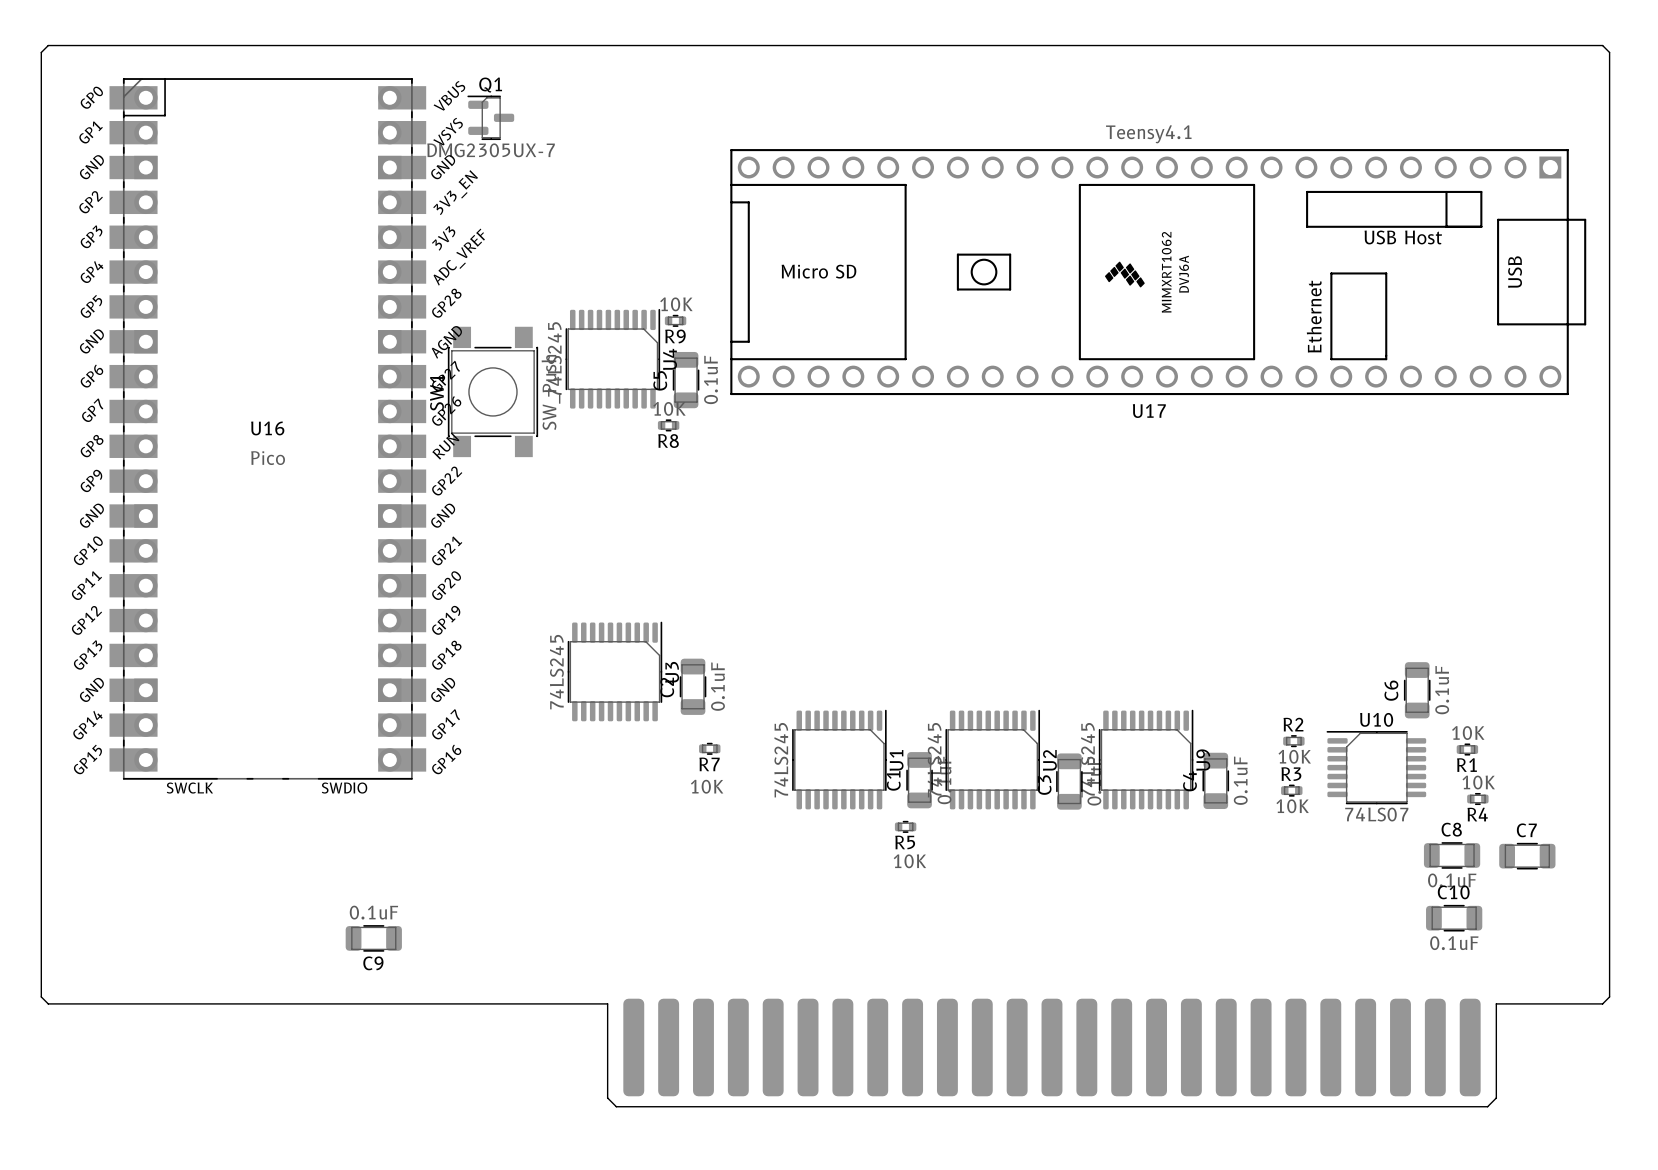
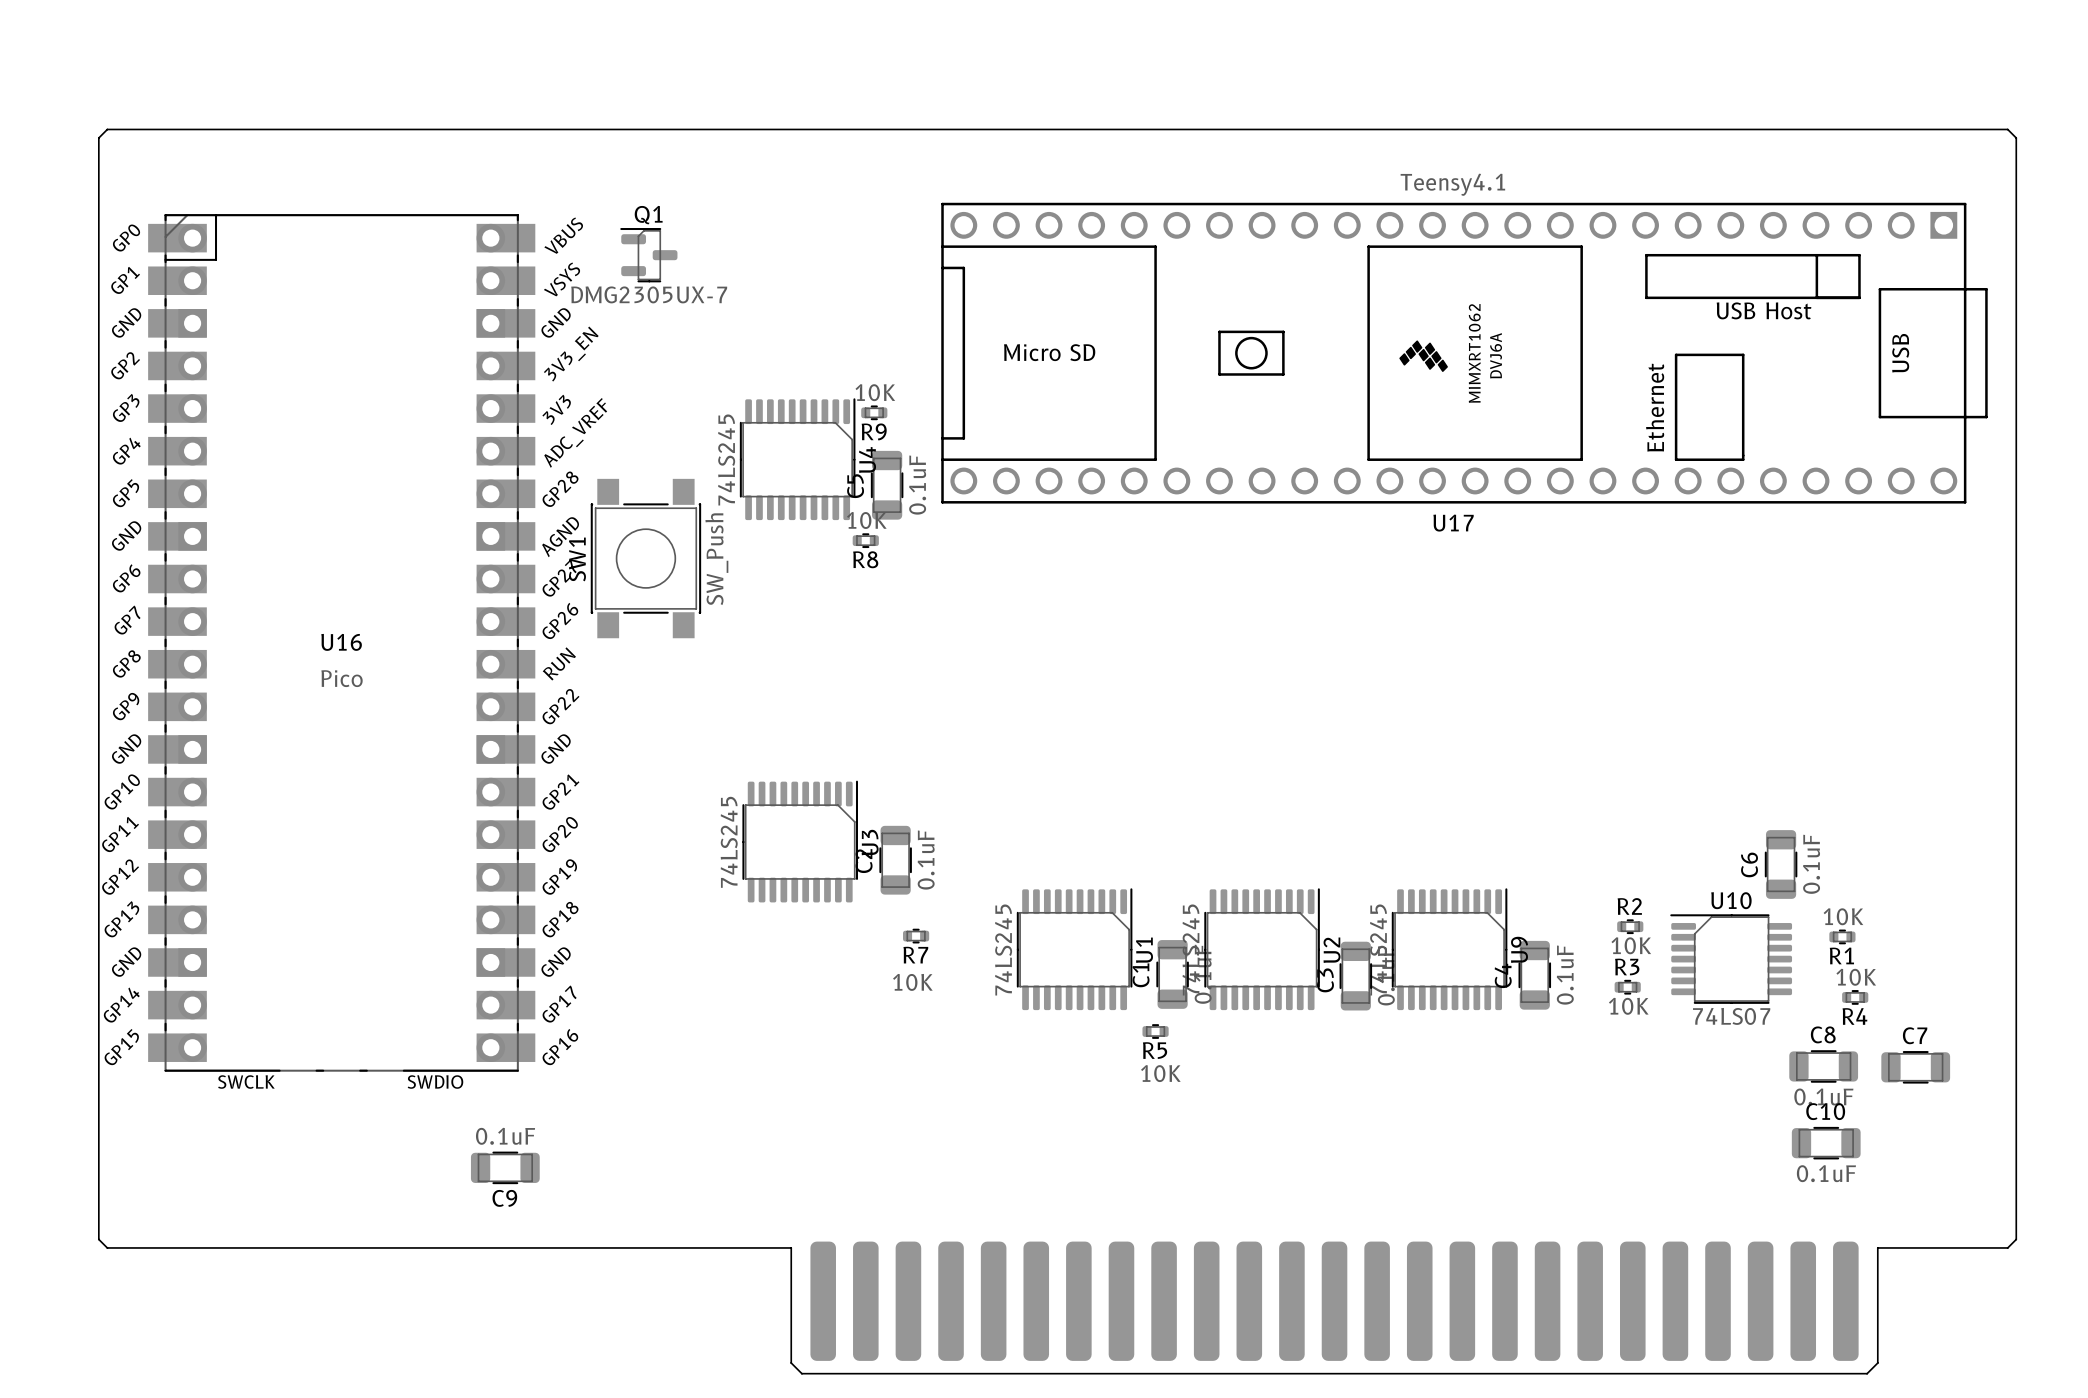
board edge: (41, 96) (41, 52) (48, 45) (1602, 45) (1609, 52) (1609, 96) -> (98, 137) (107, 129) (2007, 129) (2016, 137)
Q1 position: (490, 117) -> (648, 255)
SW1 position: (492, 391) -> (645, 558)
U16 position: (267, 428) -> (341, 642)

